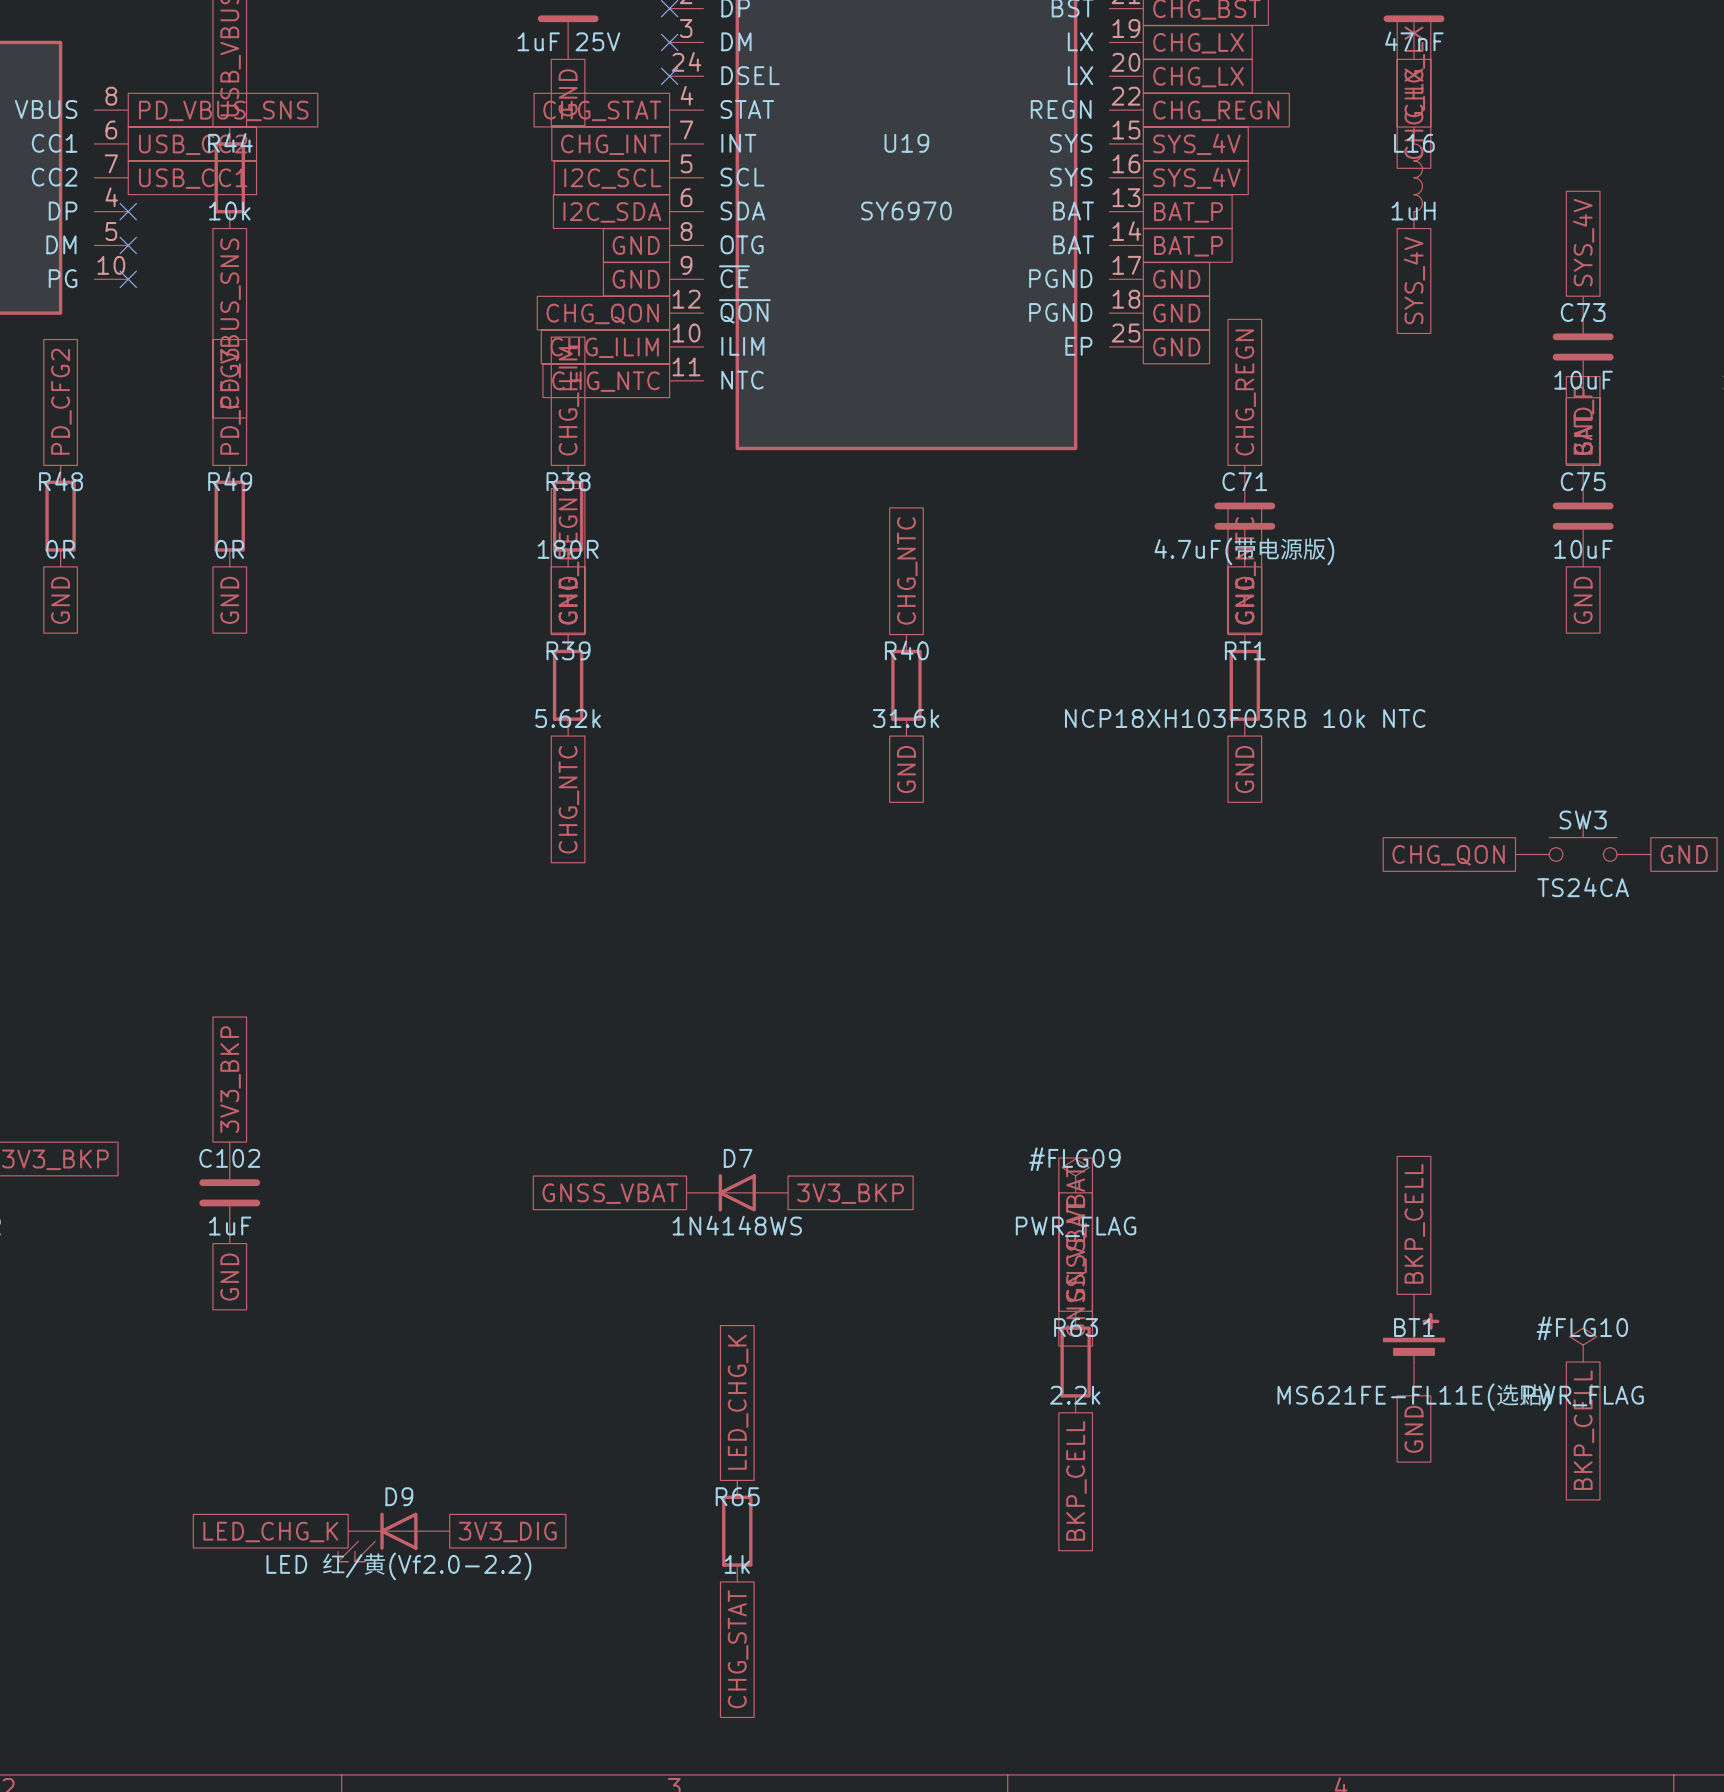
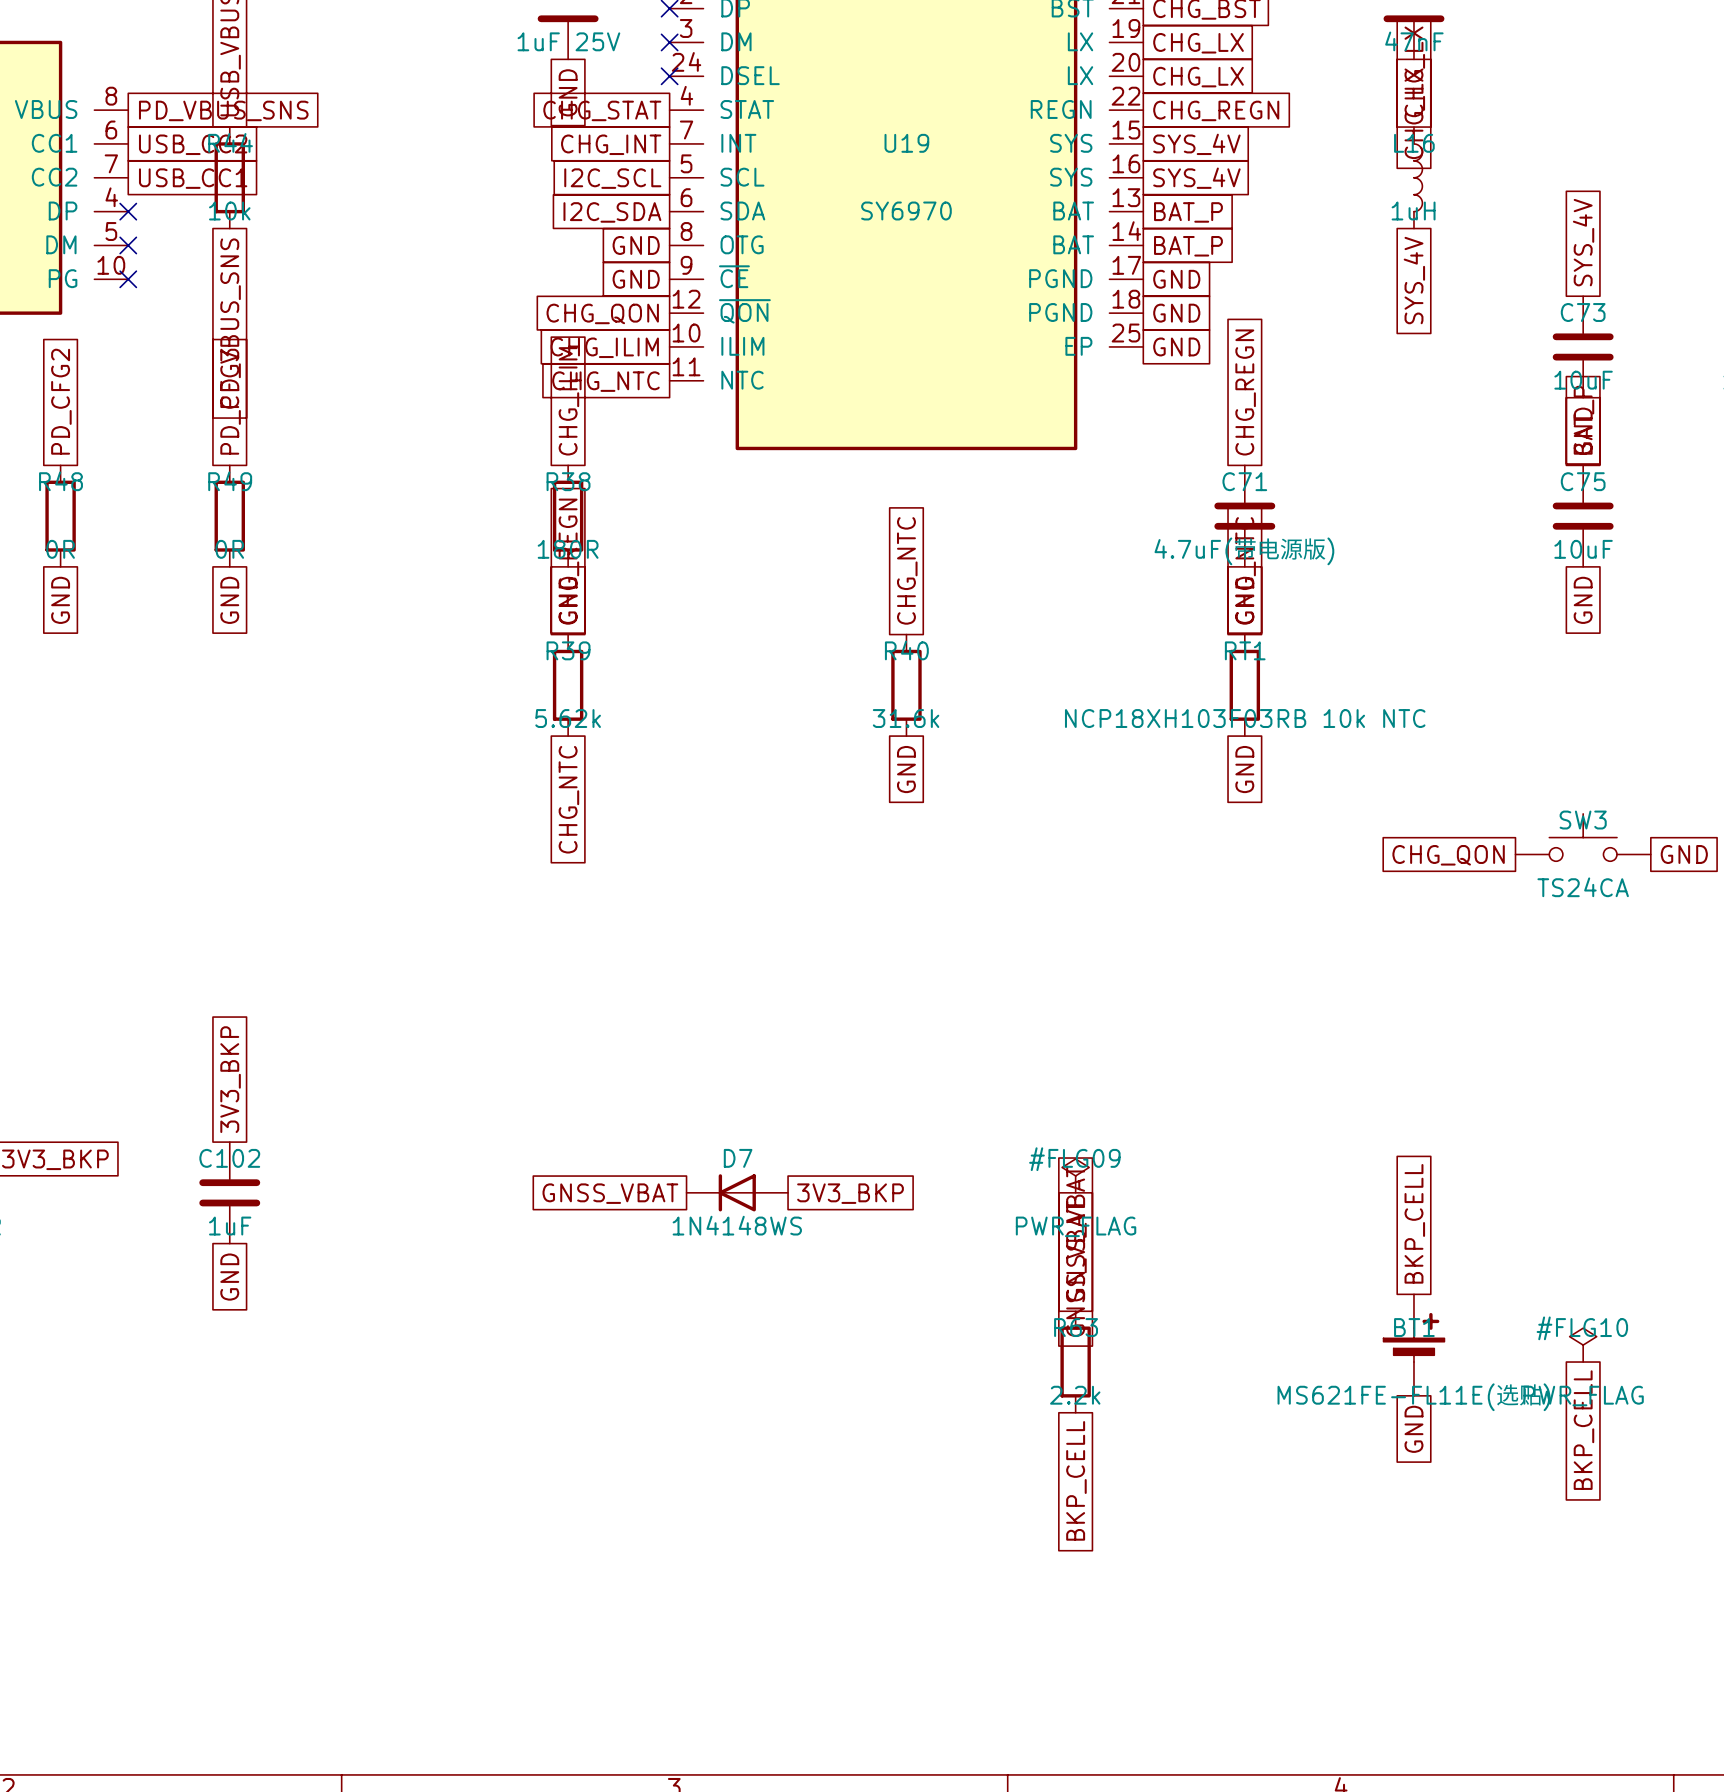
global label: LED_CHG_K (738, 1402) -> none
R65: 1k (737, 1531) -> none
global label: LED_CHG_K (270, 1532) -> none
global label: 3V3_DIG (507, 1532) -> none
D9: LED 红/黄(Vf2.0-2.2) (393, 1537) -> none
global label: CHG_STAT (738, 1649) -> none

